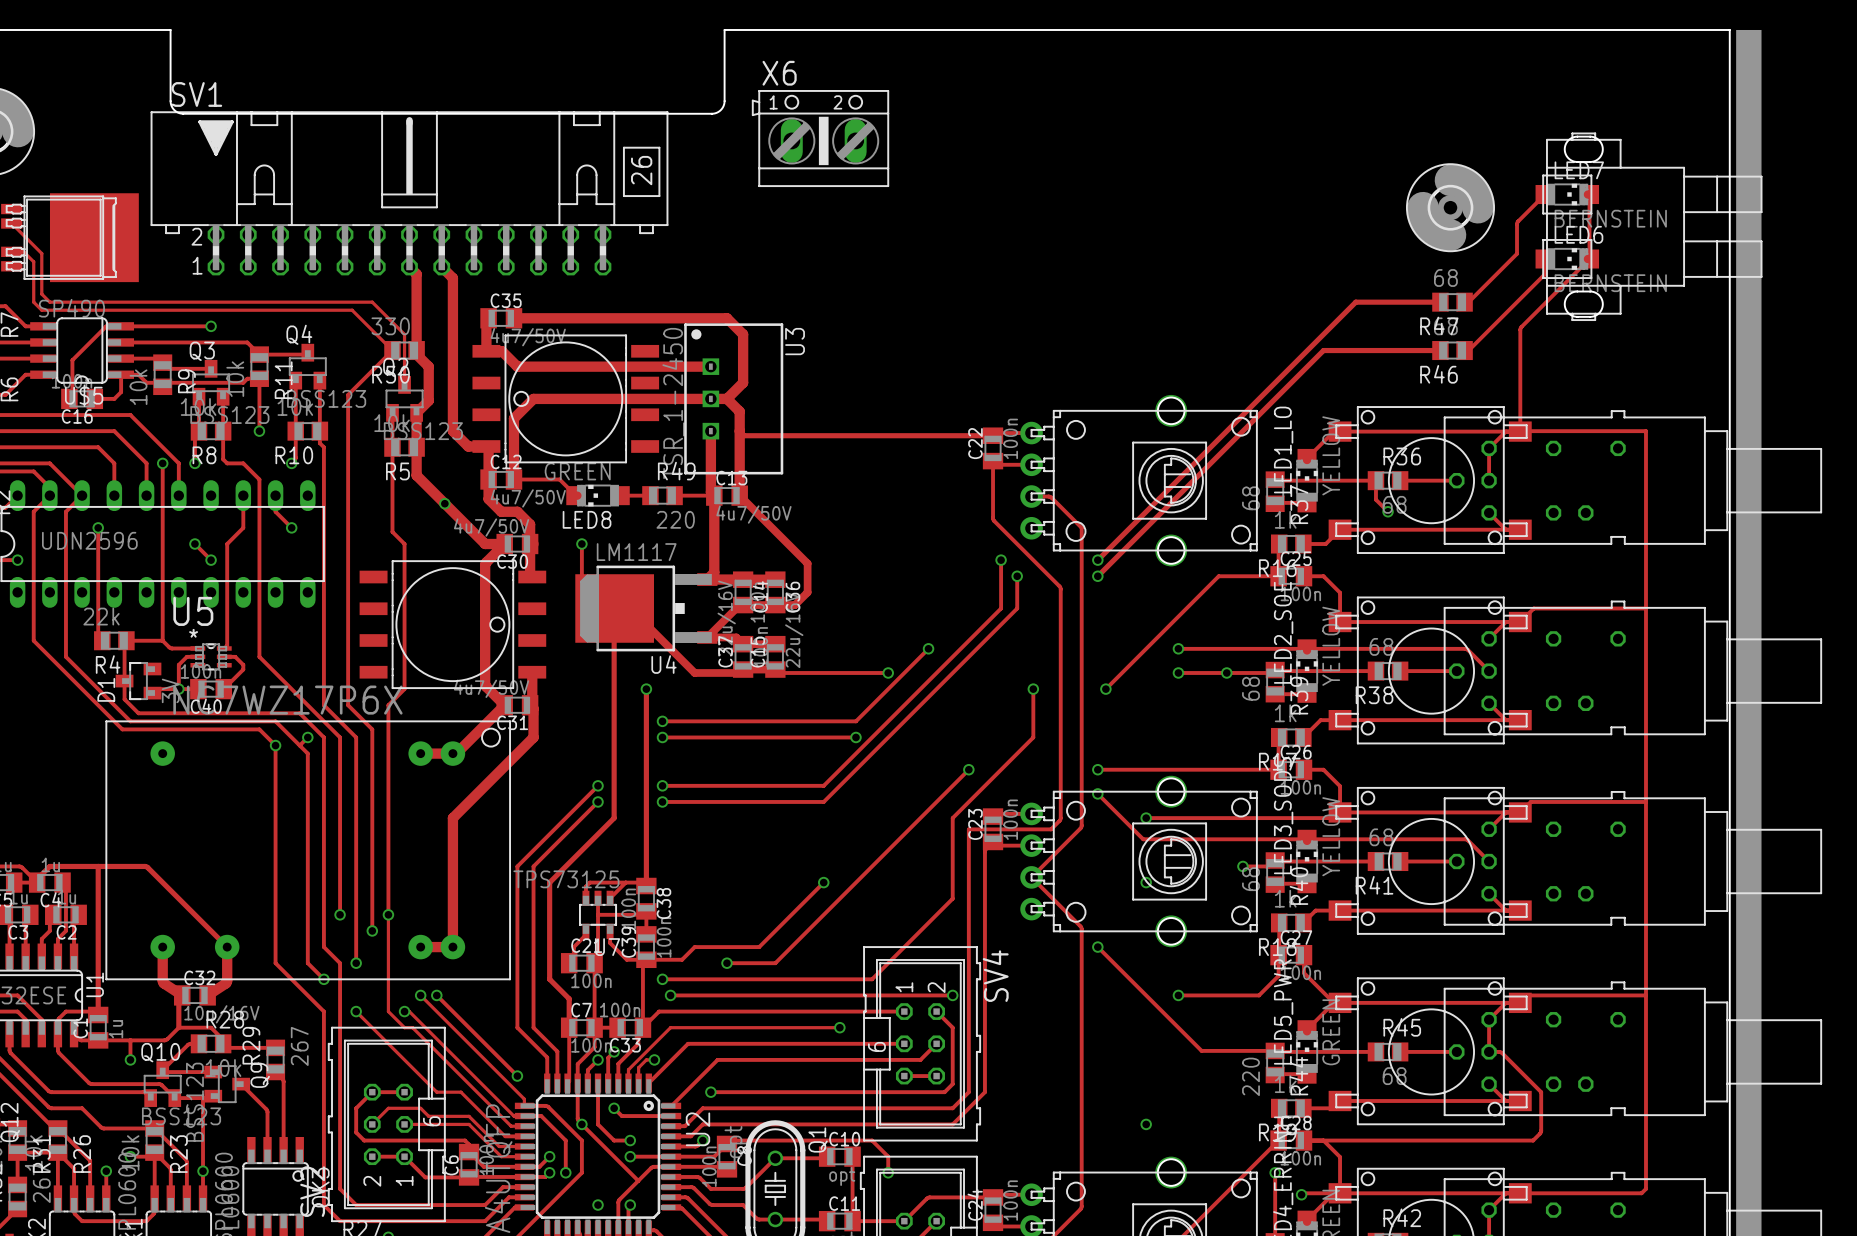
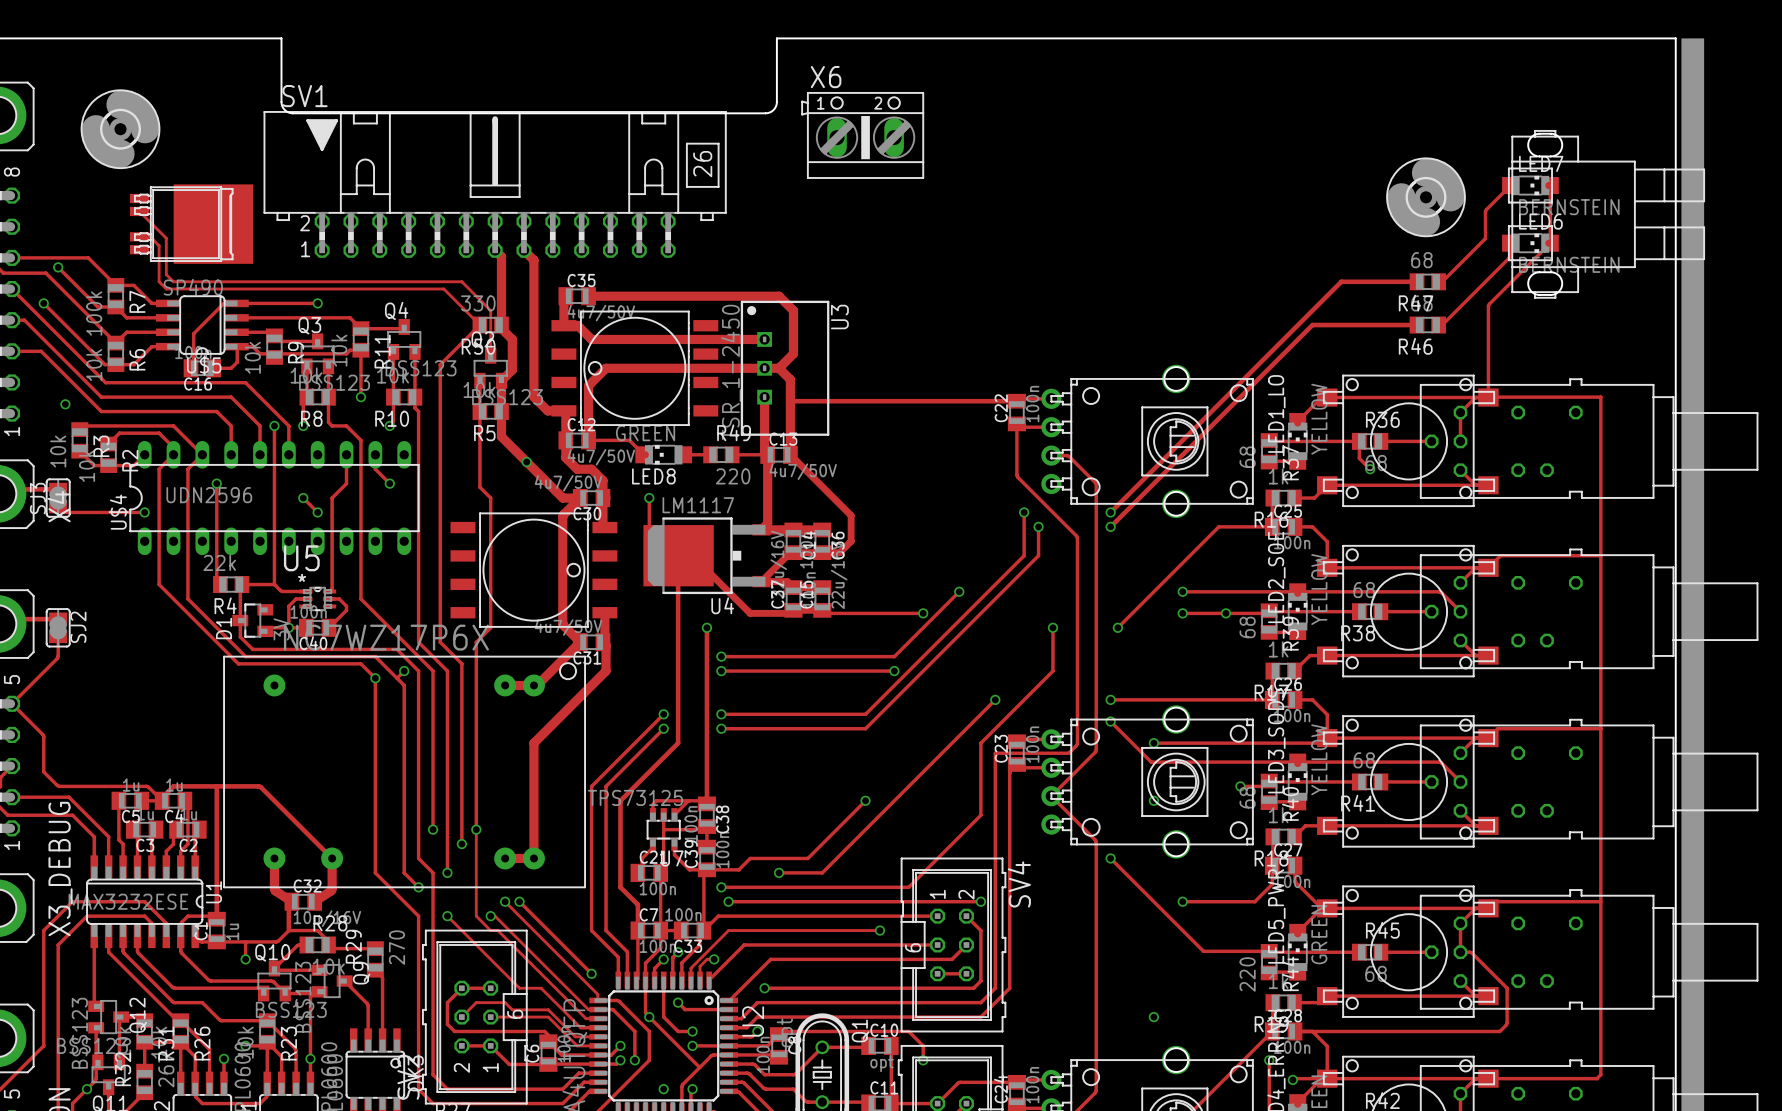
R29 value: 267 (299, 1046) -> 270 (396, 947)

